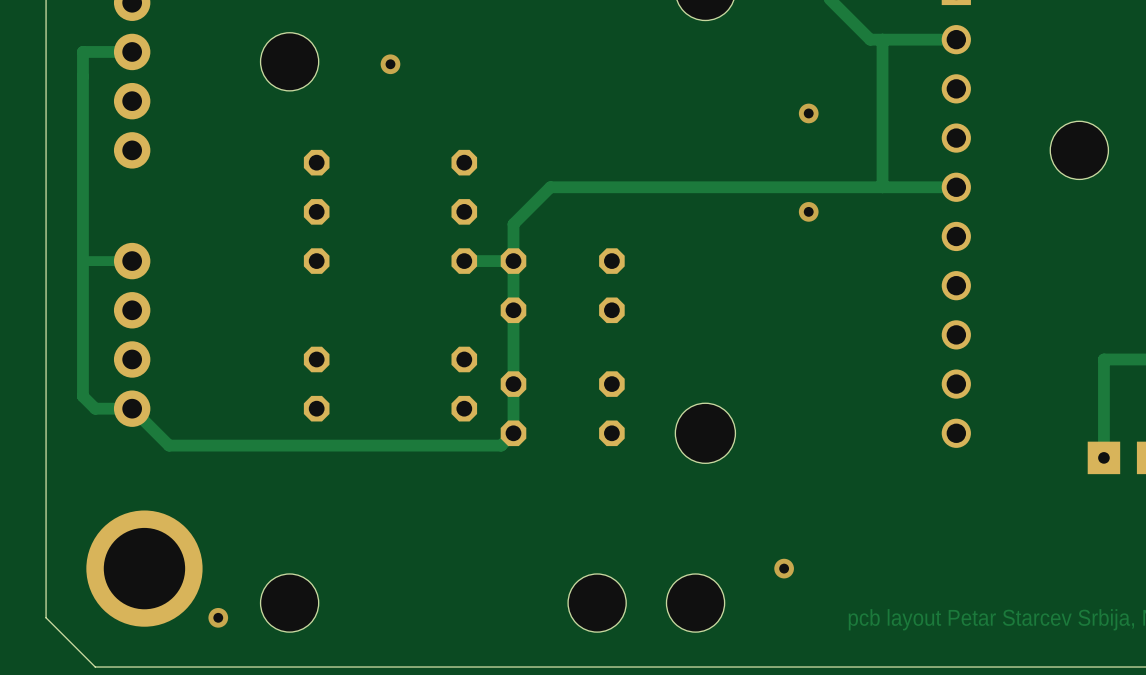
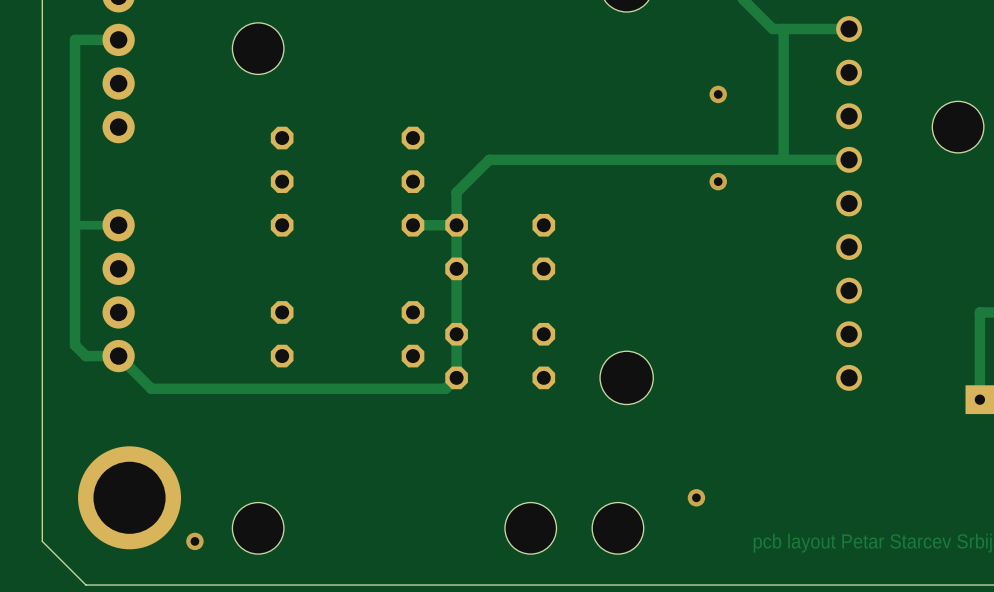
via: (390, 64) -> none

